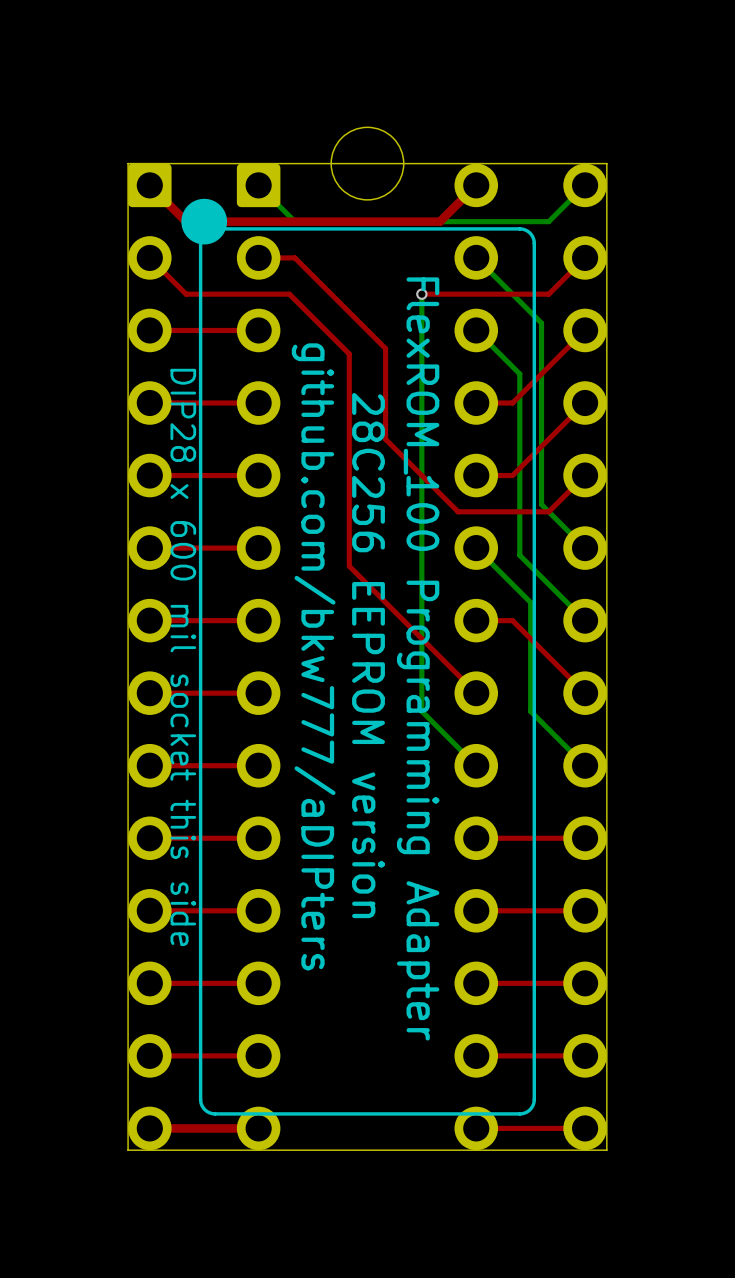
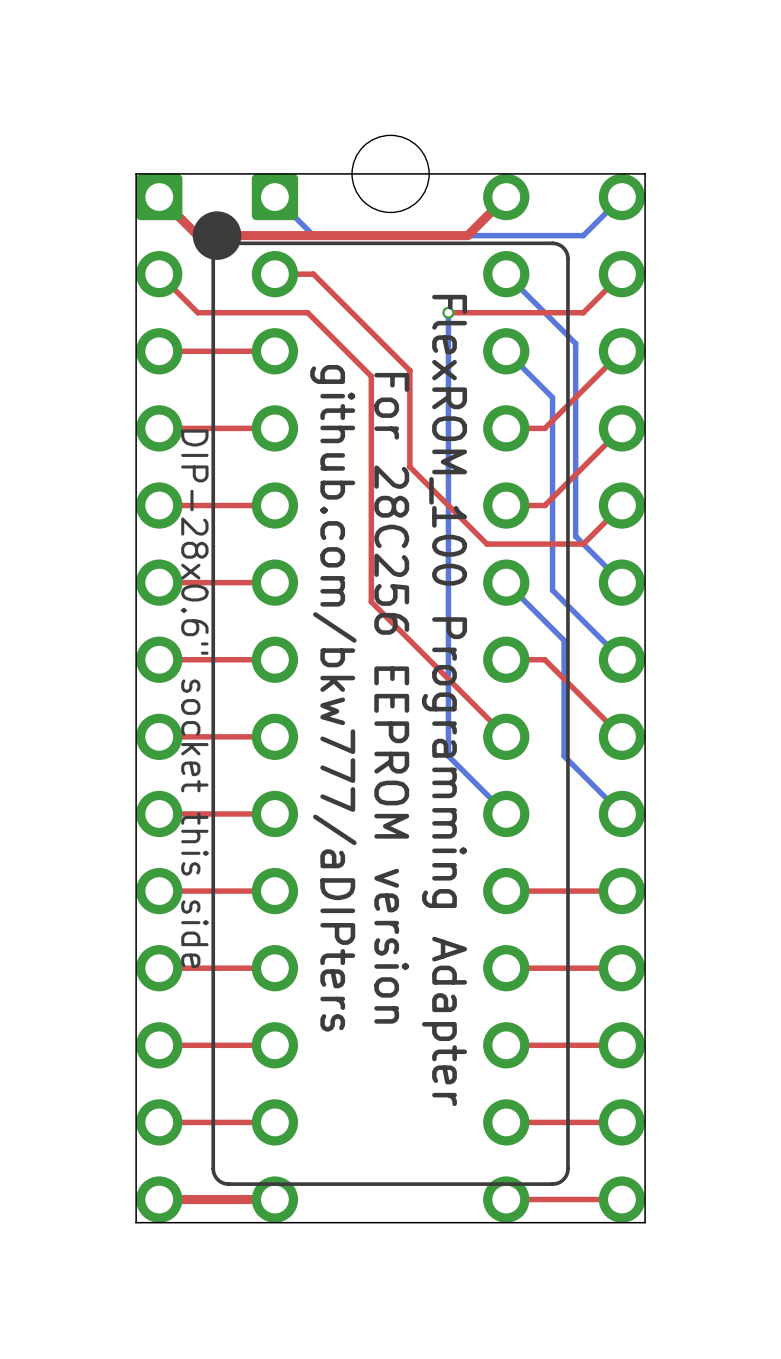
text: 28C256 EEPROM version (368, 655) -> For 28C256 EEPROM version (391, 698)
text: DIP28 x 600 mil socket this side (183, 657) -> DIP-28x0.6" socket this side (194, 698)

